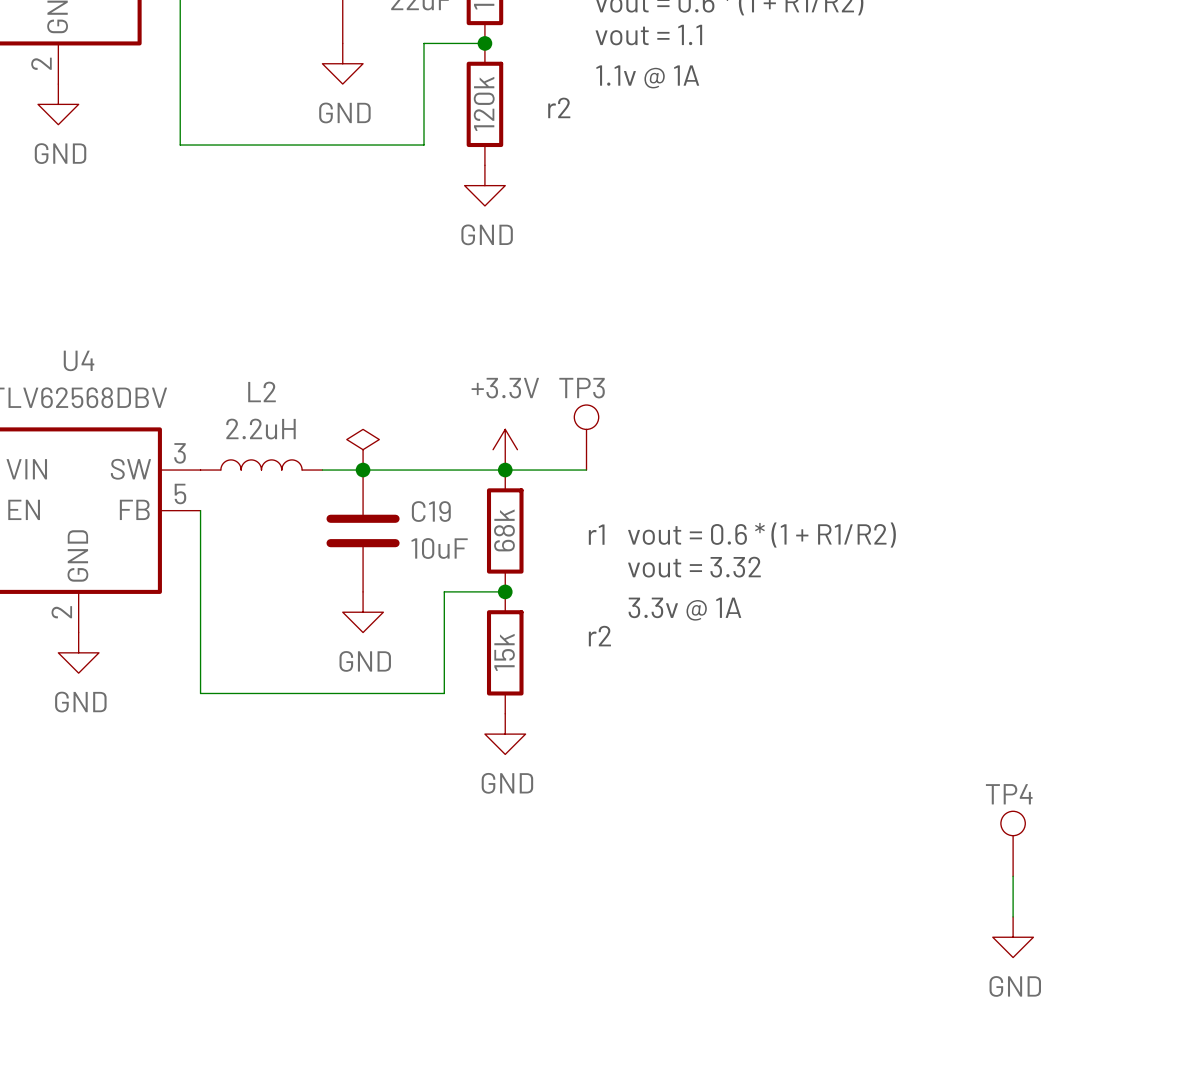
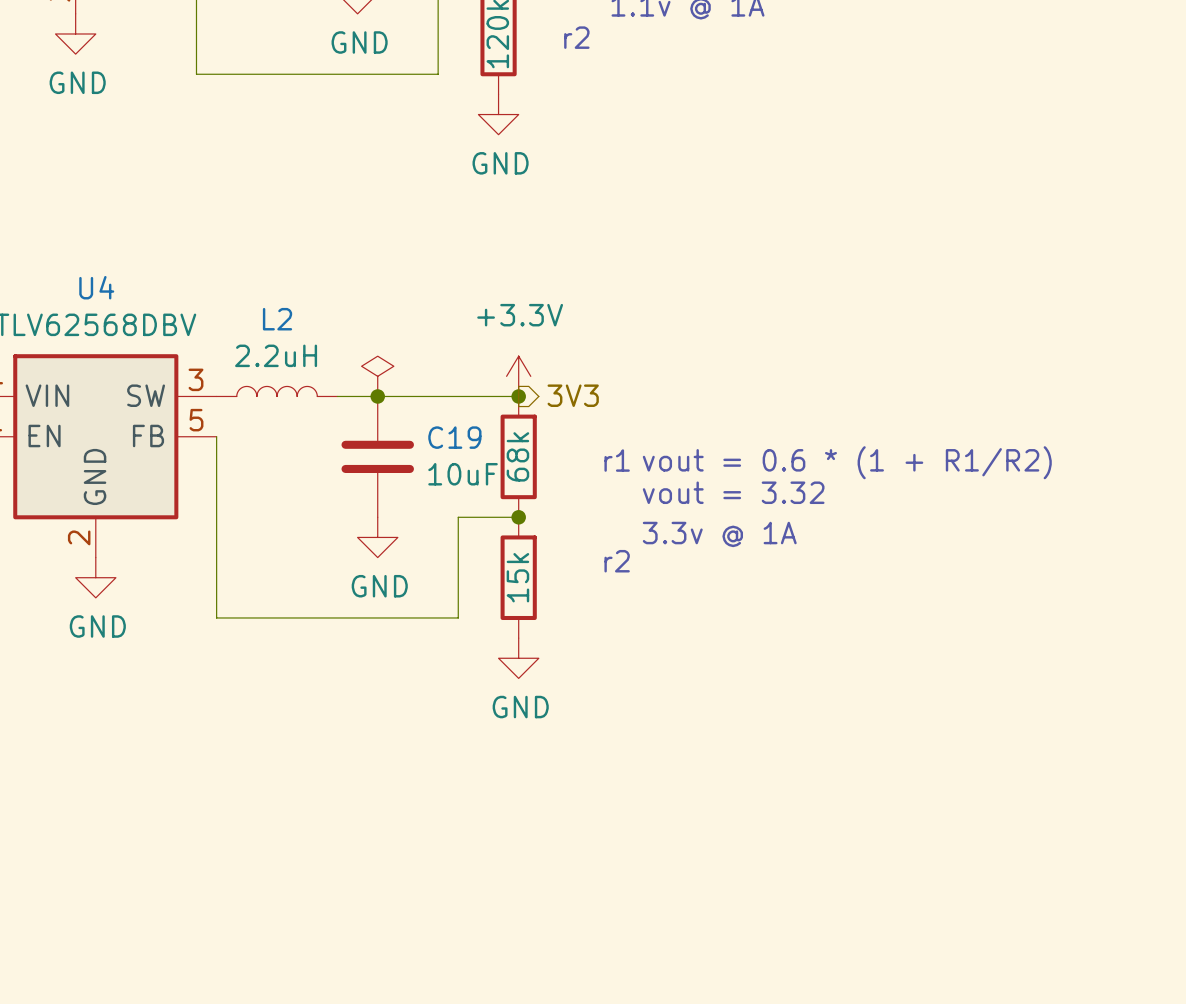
TP3: (586, 437) -> none
hierarchical label: none -> 3V3 (573, 395)
wire: (505, 470) (586, 470) -> none
TP4: (1013, 843) -> none
wire: (1013, 876) (1013, 916) -> none
power symbol: GND (1013, 937) -> none

